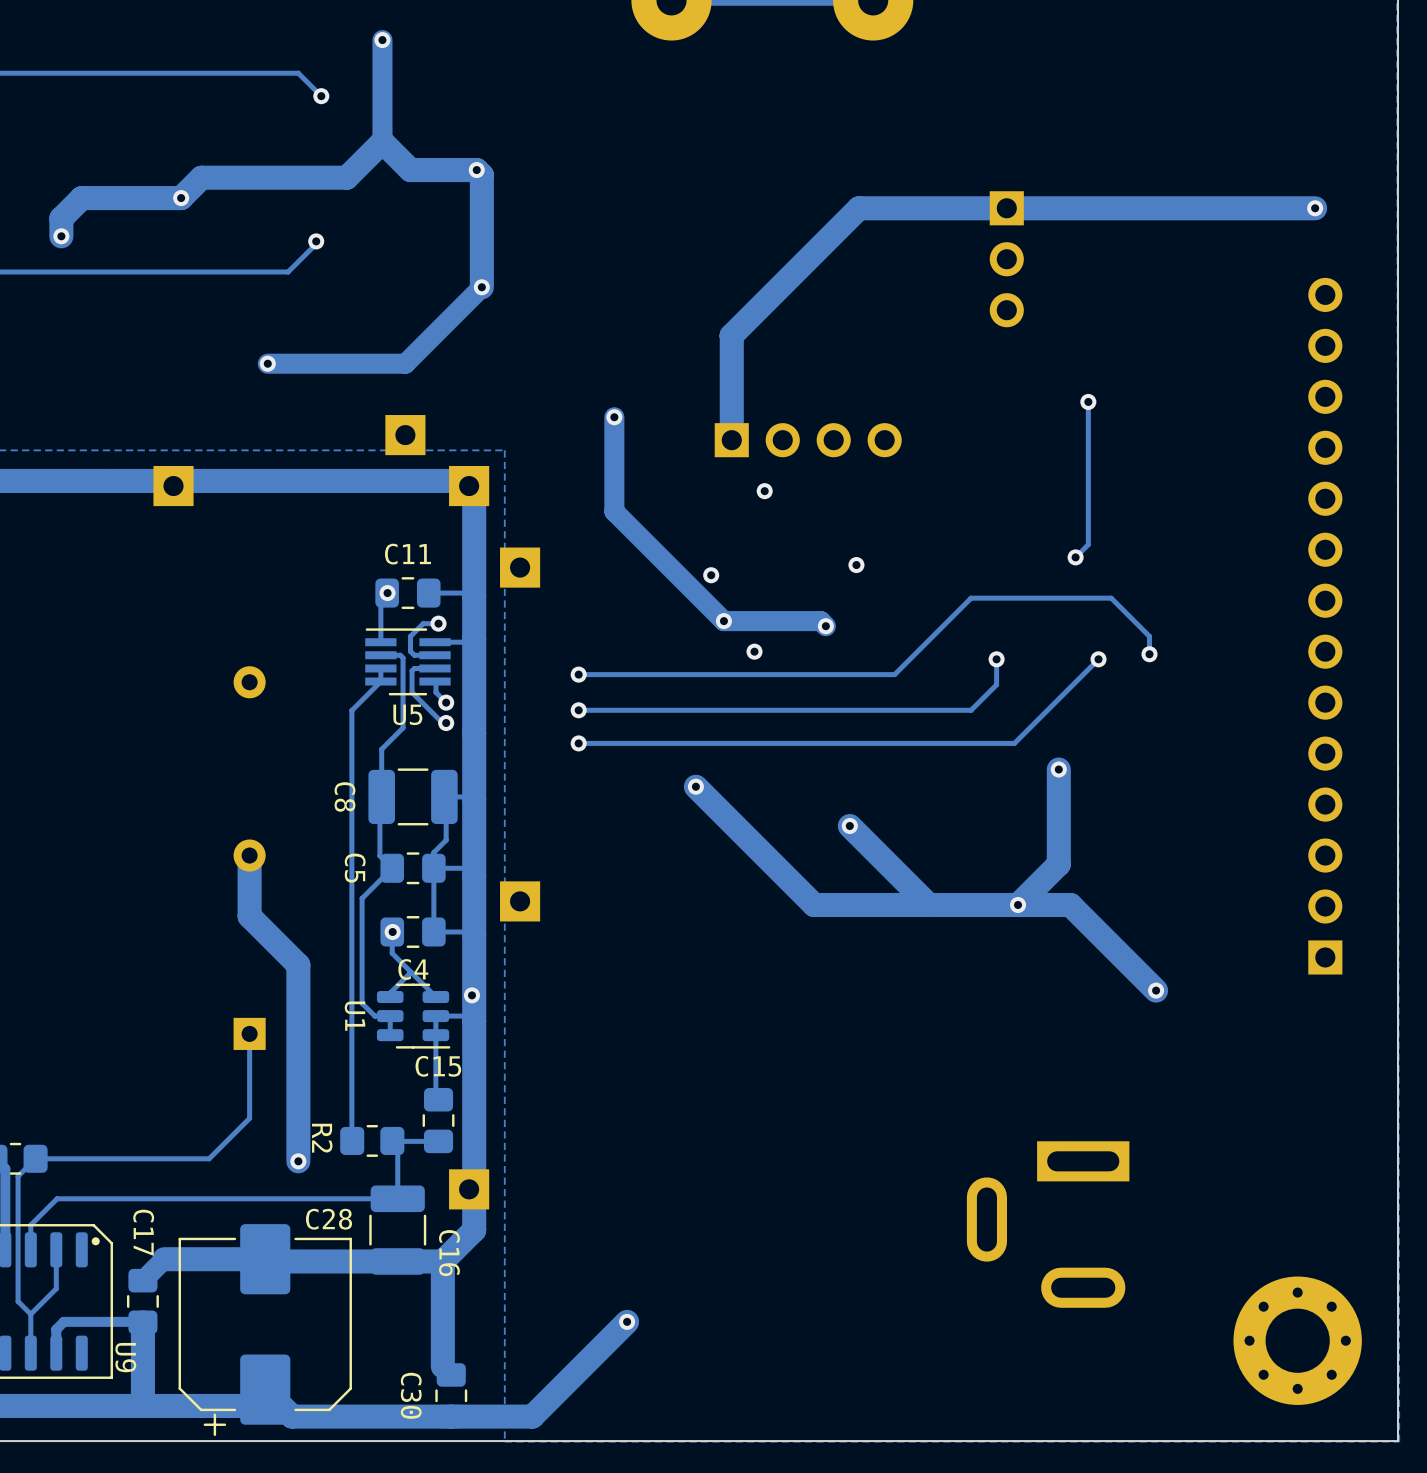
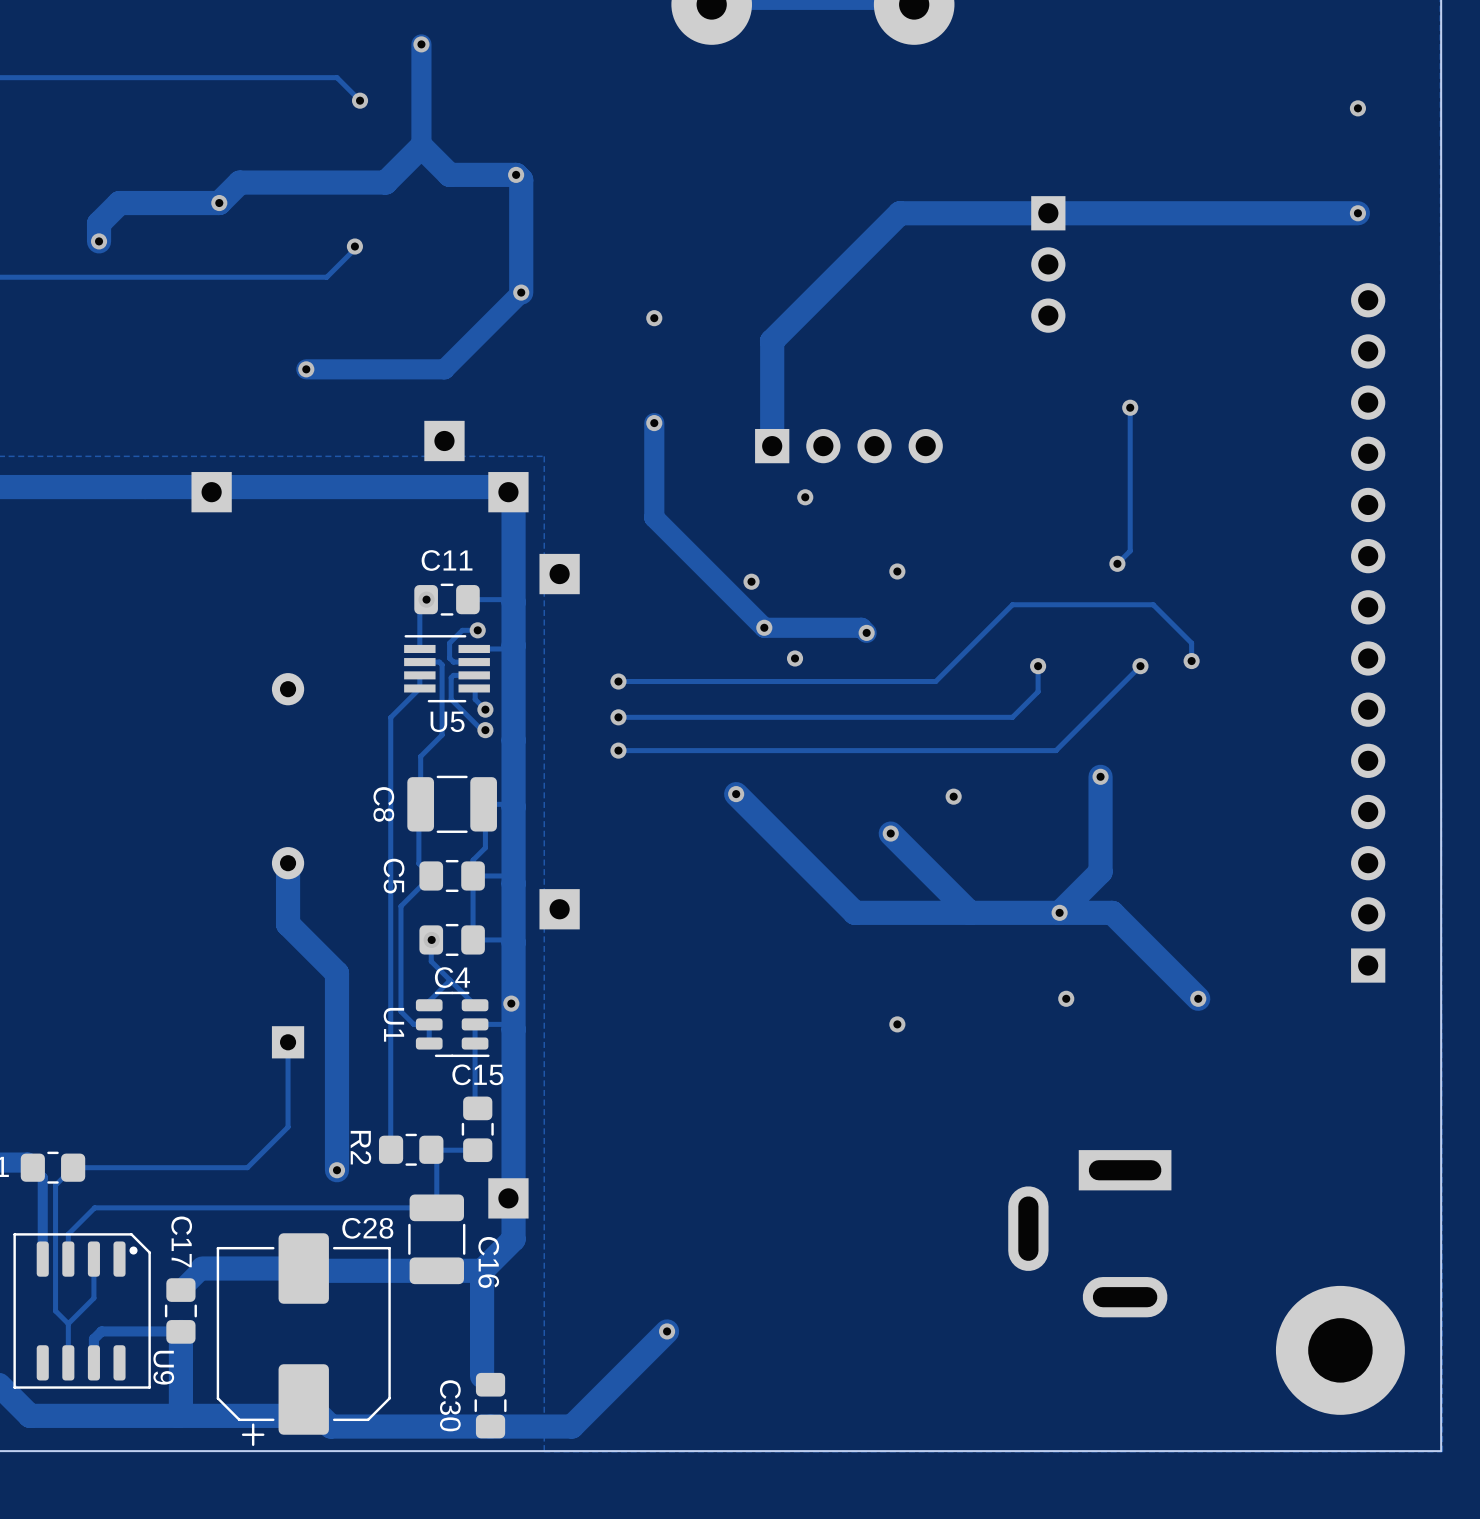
via: none -> (1357, 108)
via: none -> (654, 318)
via: none -> (953, 796)
via: none -> (1066, 998)
via: none -> (897, 1024)
part footprint: [1233, 1276, 1362, 1405] -> [1275, 1285, 1405, 1415]

